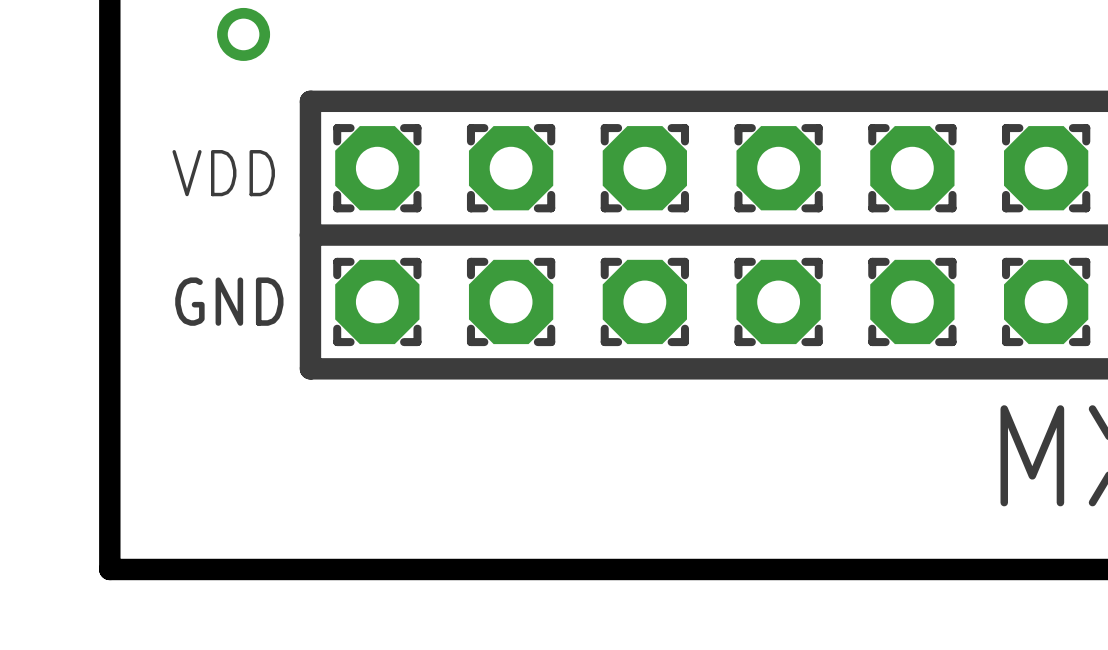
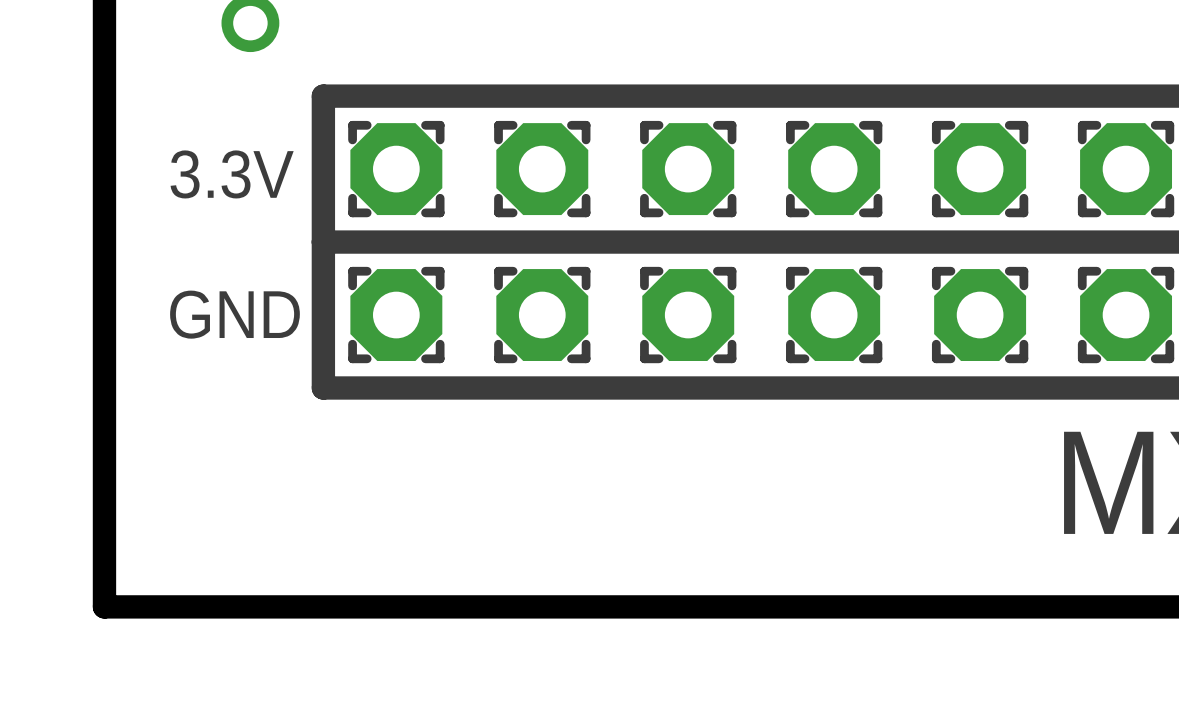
text: VDD (223, 173) -> 3.3V (232, 174)

